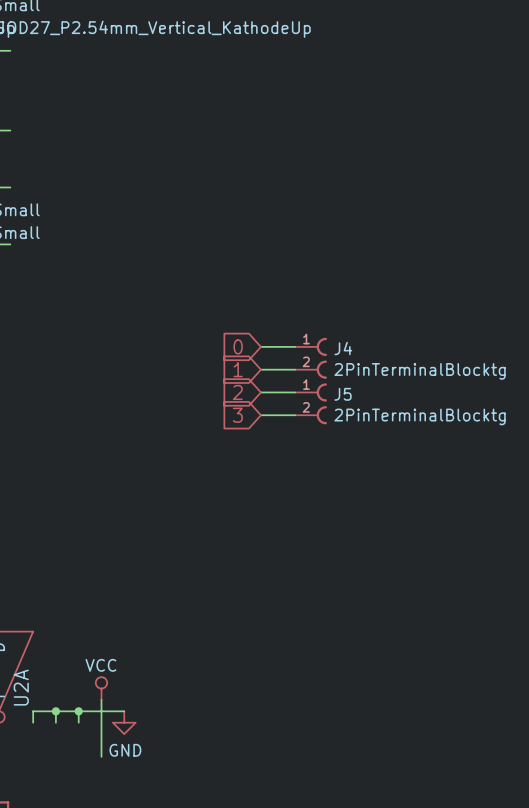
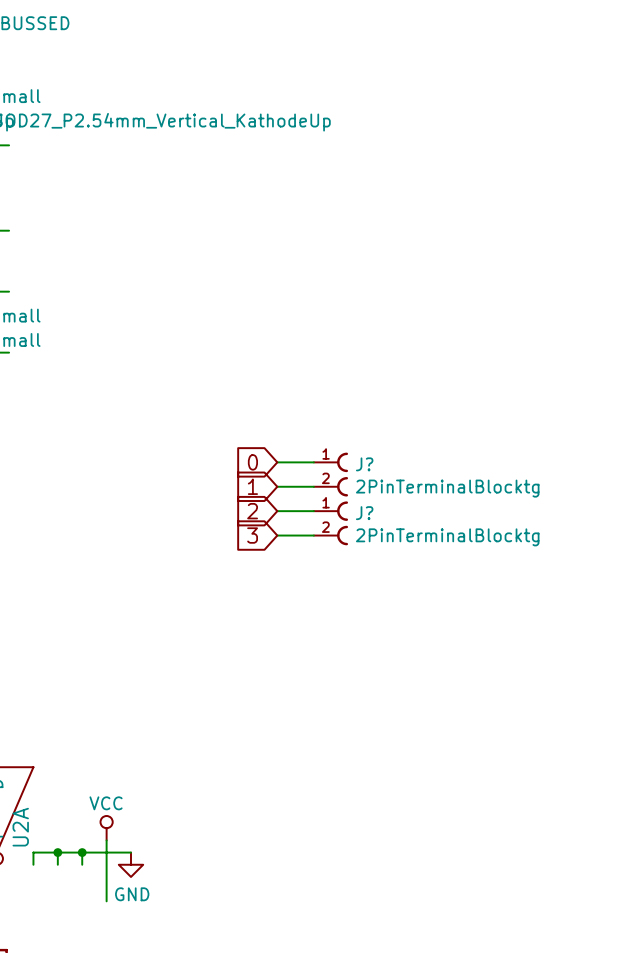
J4 name: J4 (343, 348) -> J? (364, 464)
J5 name: J5 (343, 394) -> J? (364, 513)

